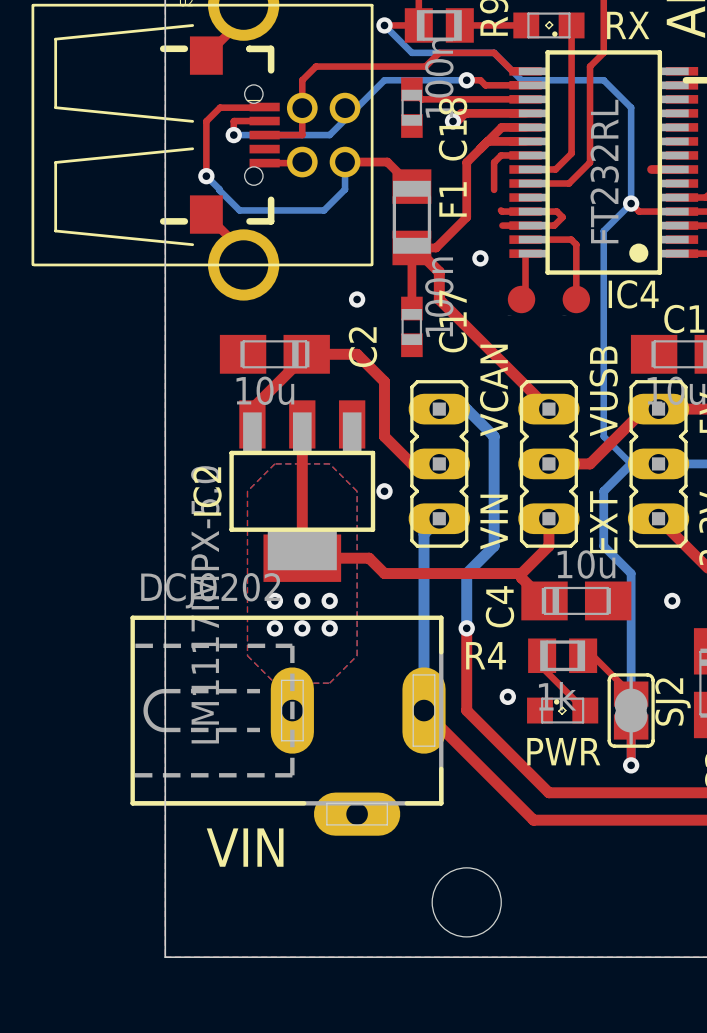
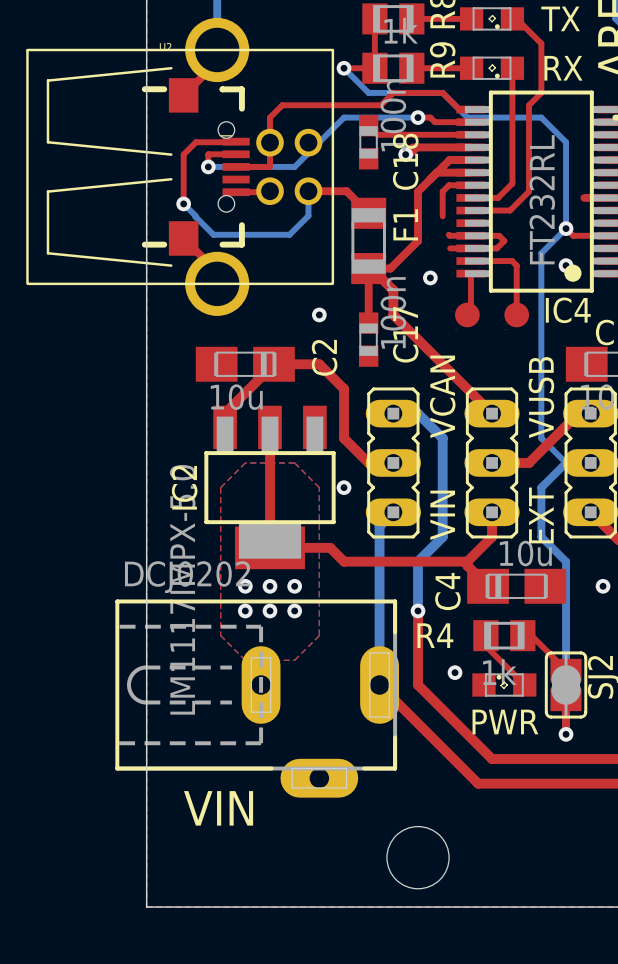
via: none -> (566, 265)

